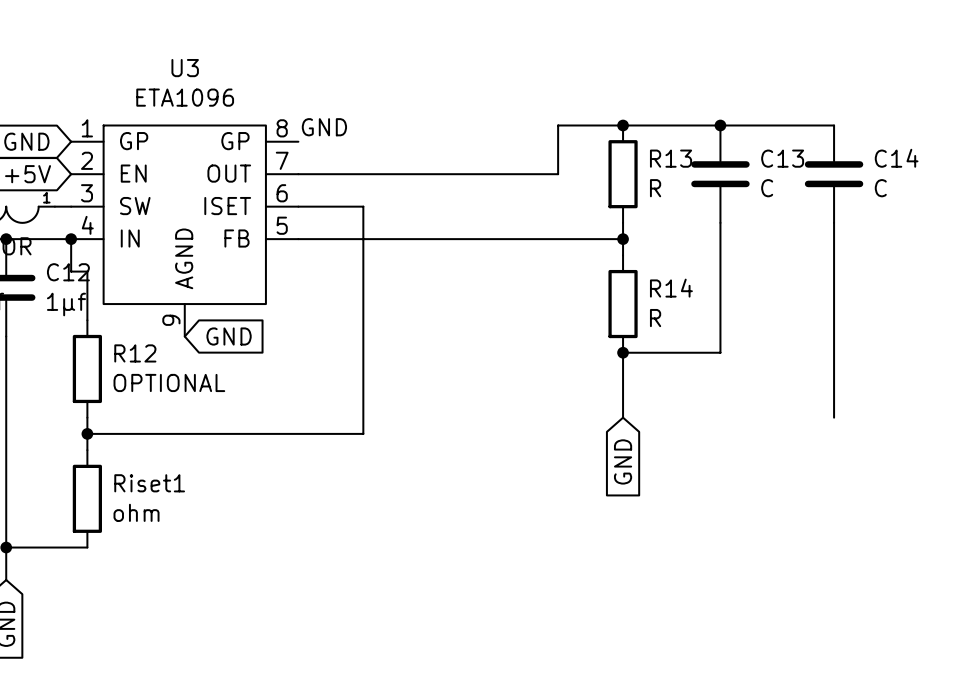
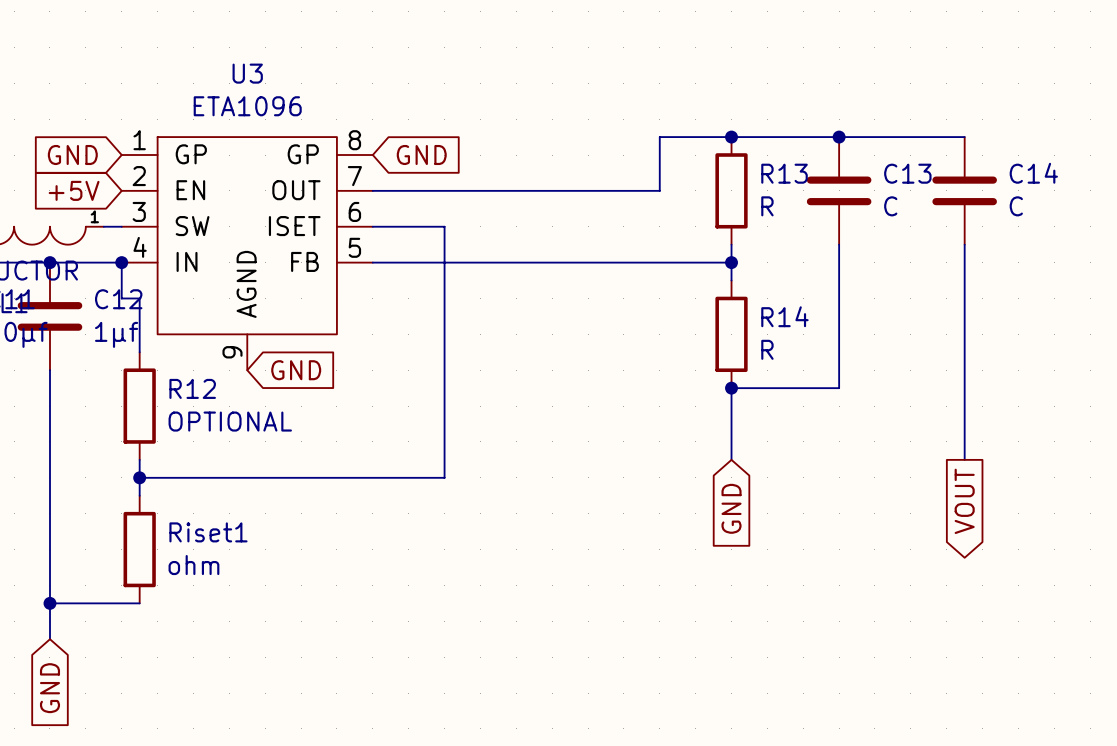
label: GND (324, 127) -> none
global label: none -> GND (421, 155)
global label: none -> VOUT (964, 501)

